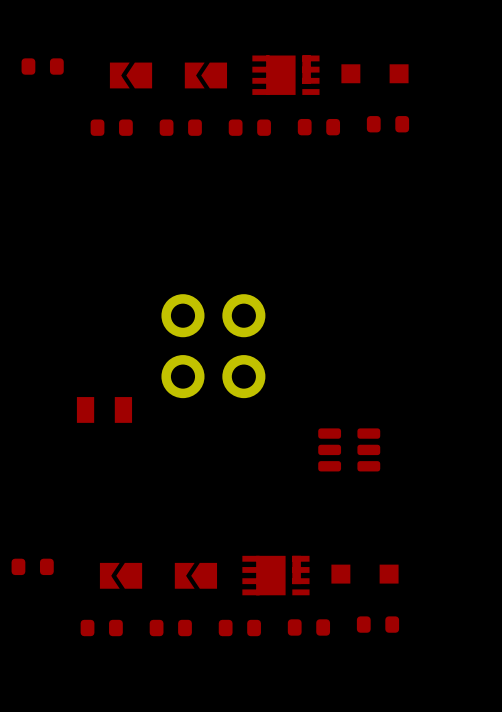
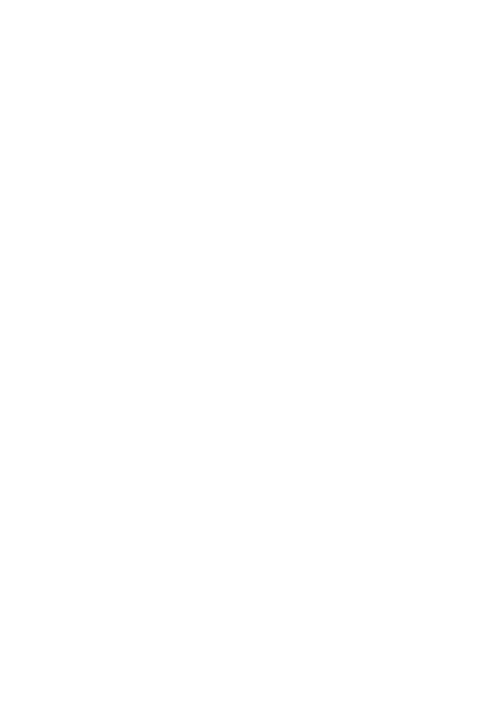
part: (42, 66) -> none
part: (374, 73) -> none
part: (131, 75) -> none
part: (205, 75) -> none
part: (285, 75) -> none
part: (387, 124) -> none
part: (111, 127) -> none
part: (180, 127) -> none
part: (249, 127) -> none
part: (318, 127) -> none
part: (213, 346) -> none
part: (104, 409) -> none
part: (349, 449) -> none
part: (32, 566) -> none
part: (364, 574) -> none
part: (121, 575) -> none
part: (195, 575) -> none
part: (275, 575) -> none
part: (377, 624) -> none
part: (308, 627) -> none
part: (101, 628) -> none
part: (170, 628) -> none
part: (239, 628) -> none

